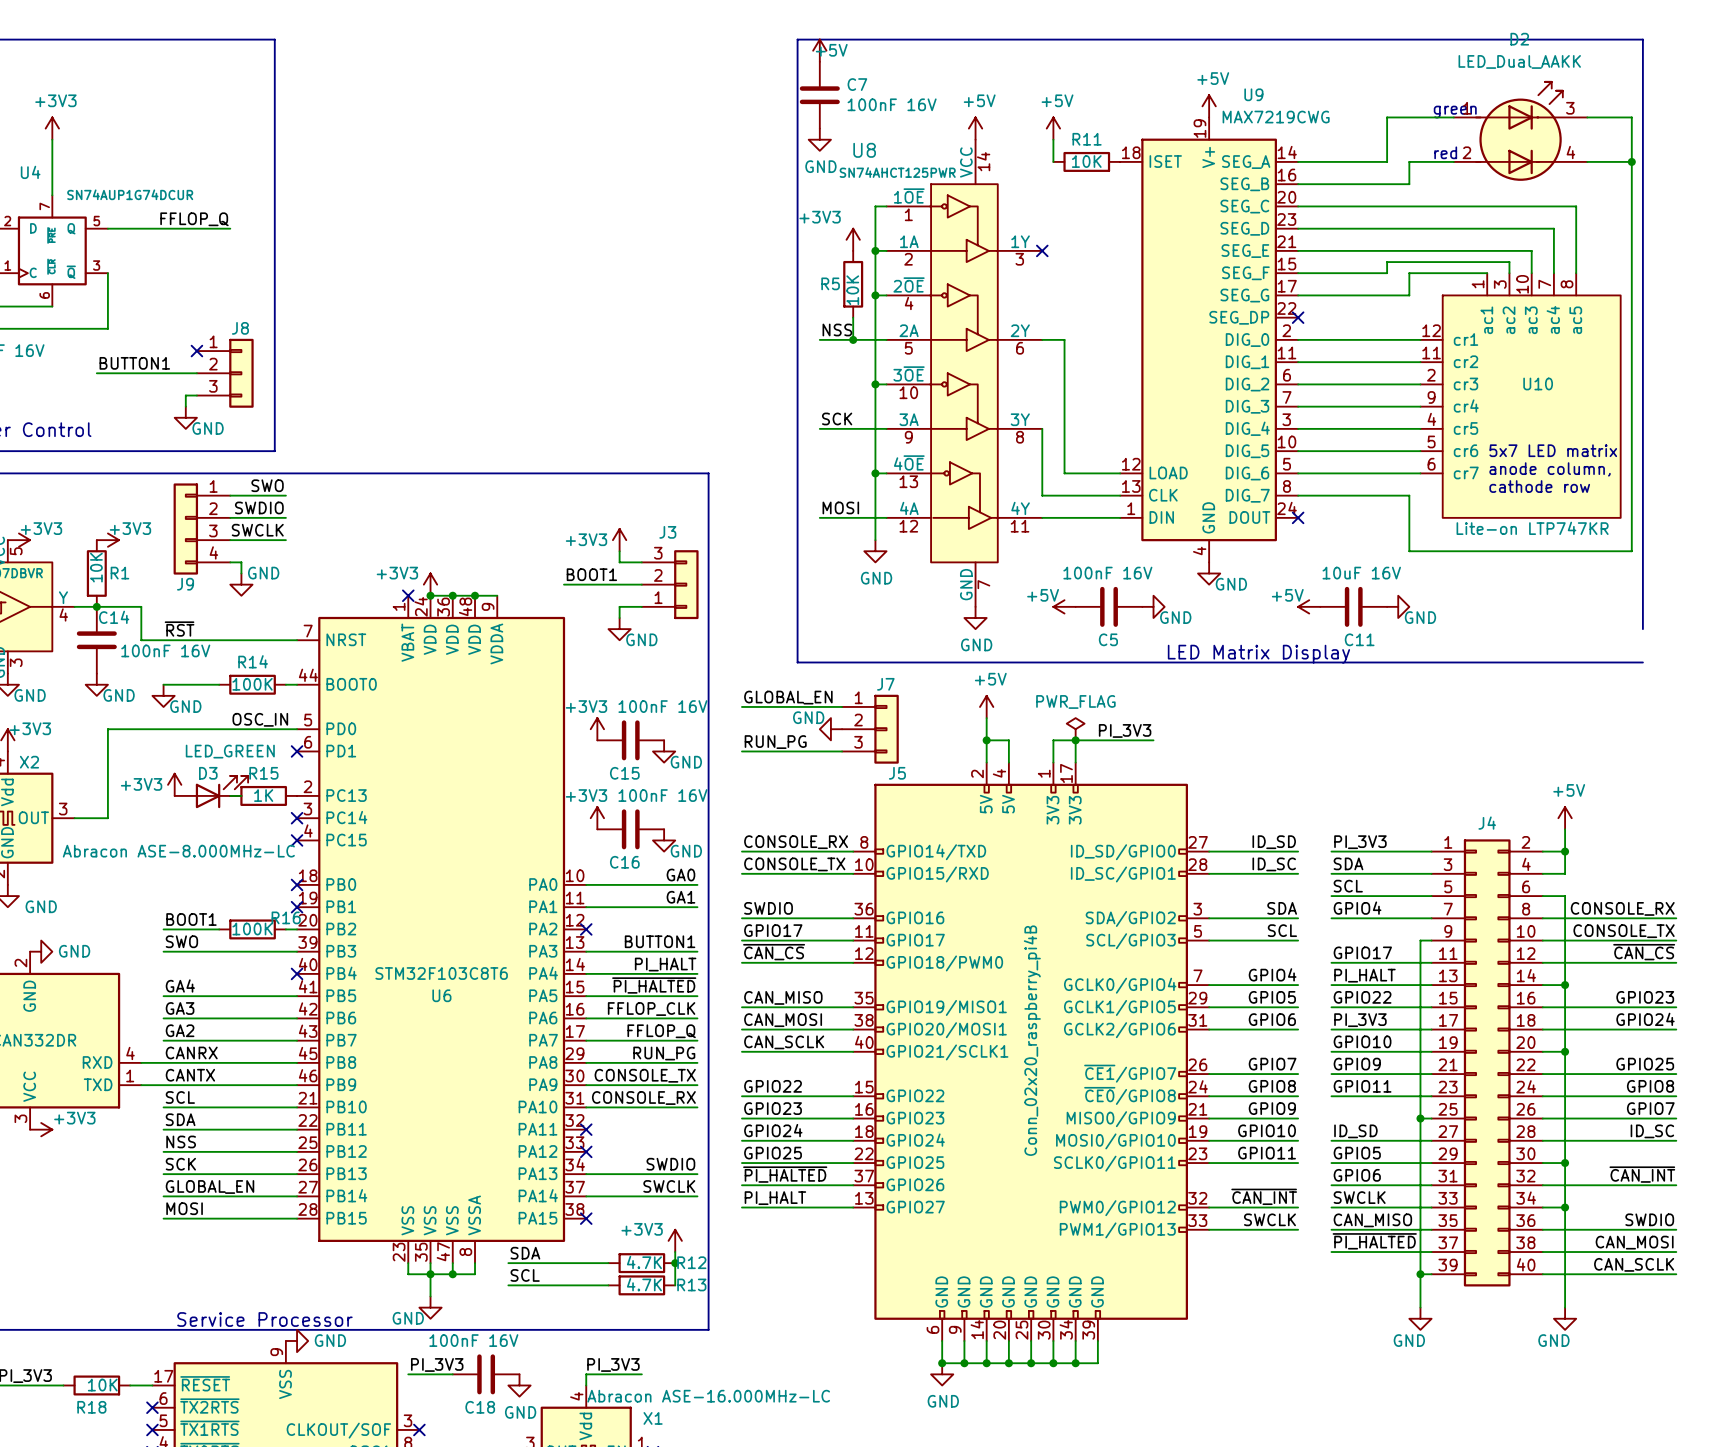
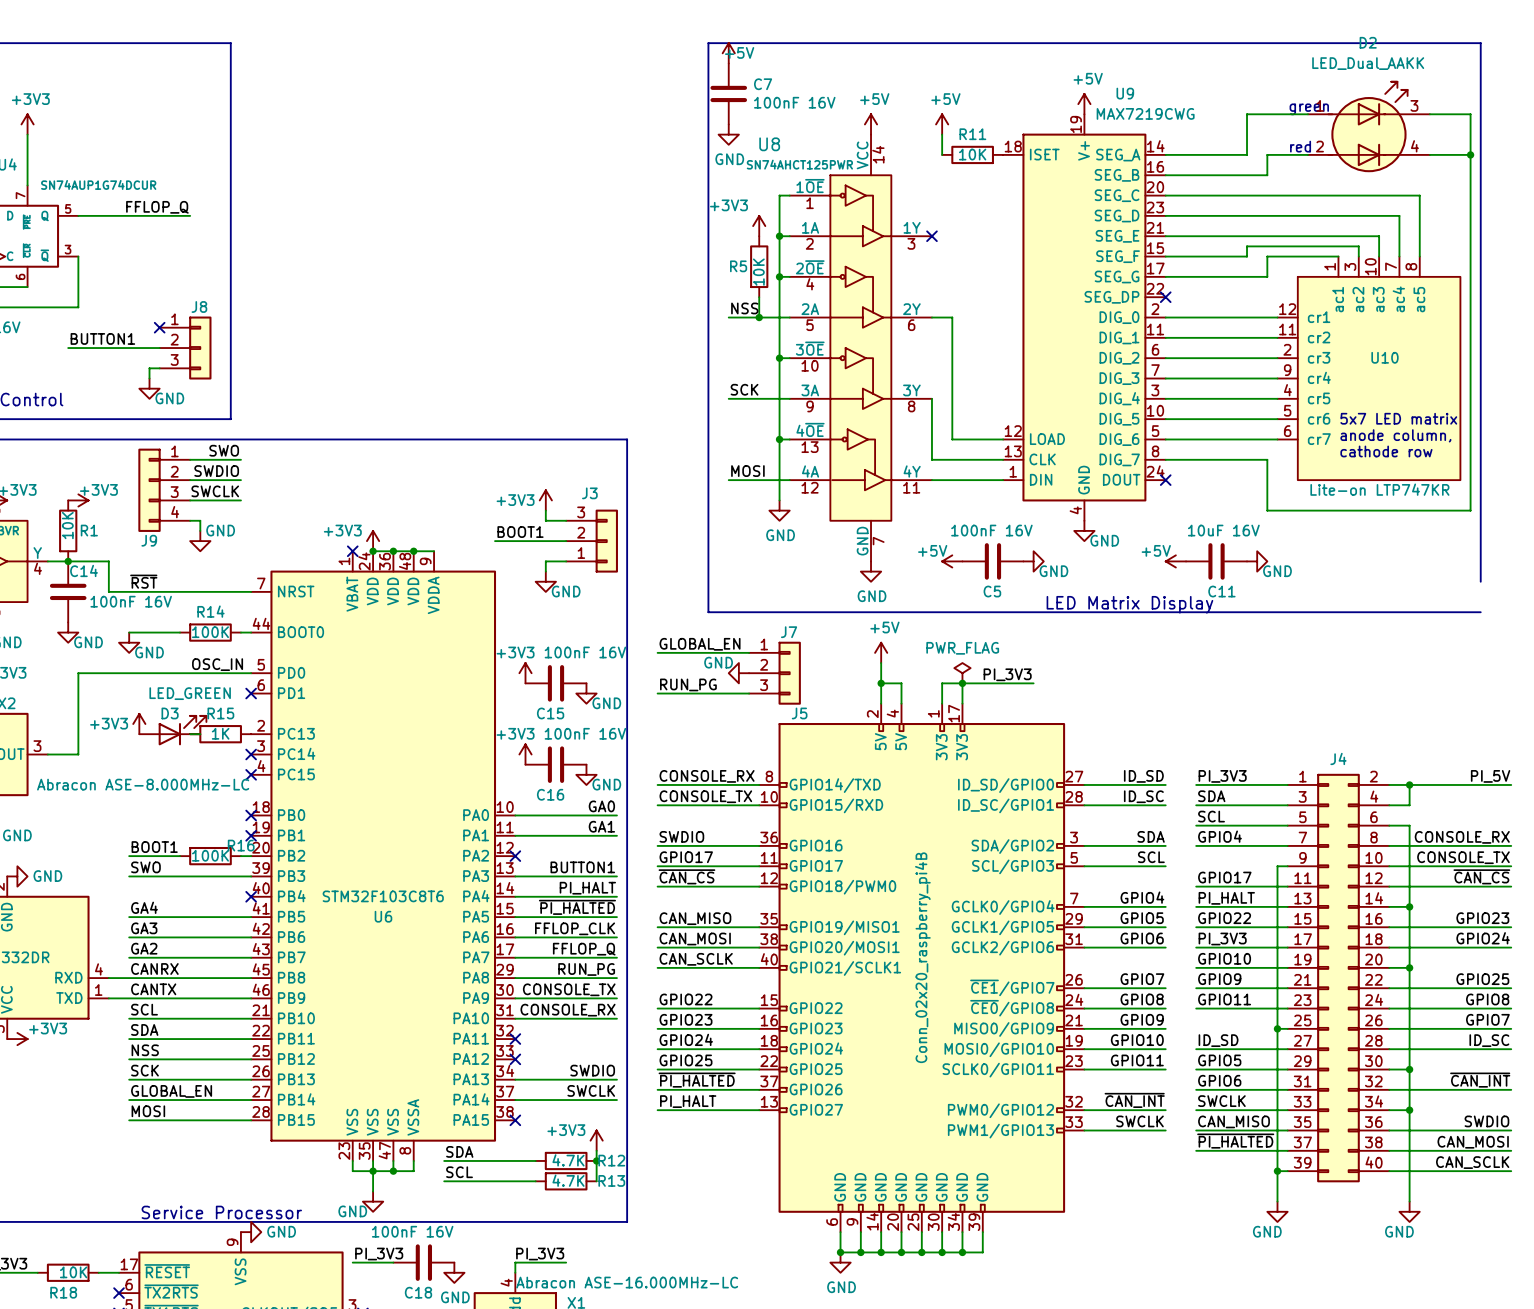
power symbol: +5V (1565, 818) -> none
wire: (1565, 829) (1565, 851) -> (1511, 784) (1409, 784)
label: none -> PI_5V (1490, 776)

